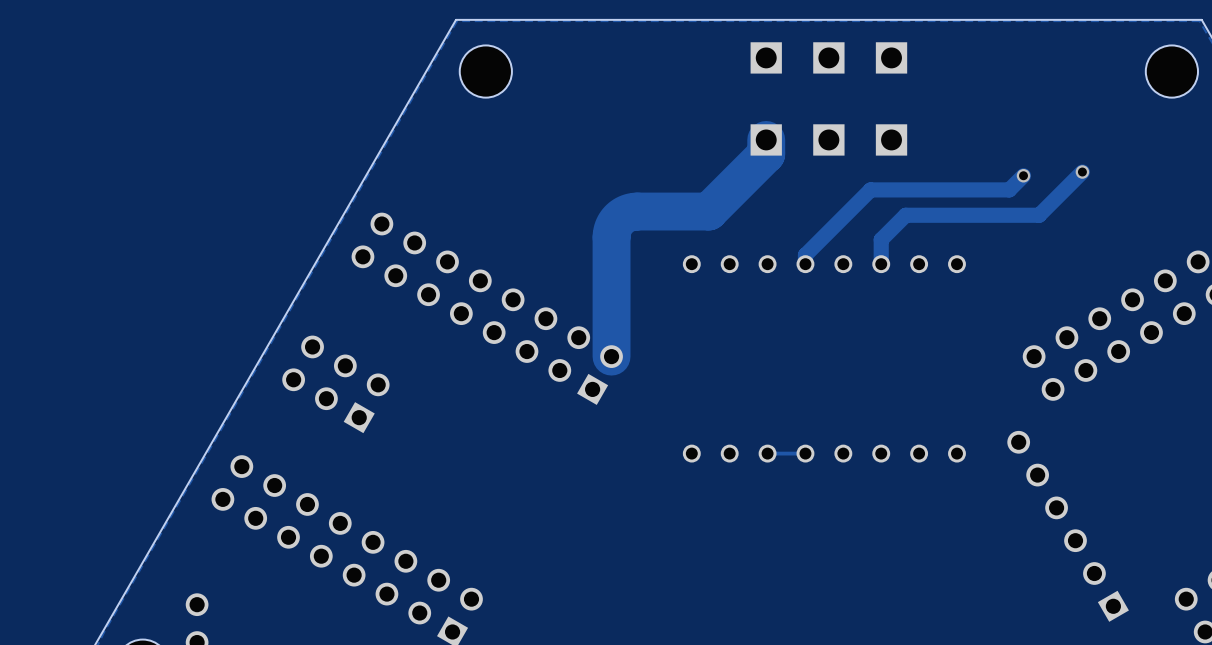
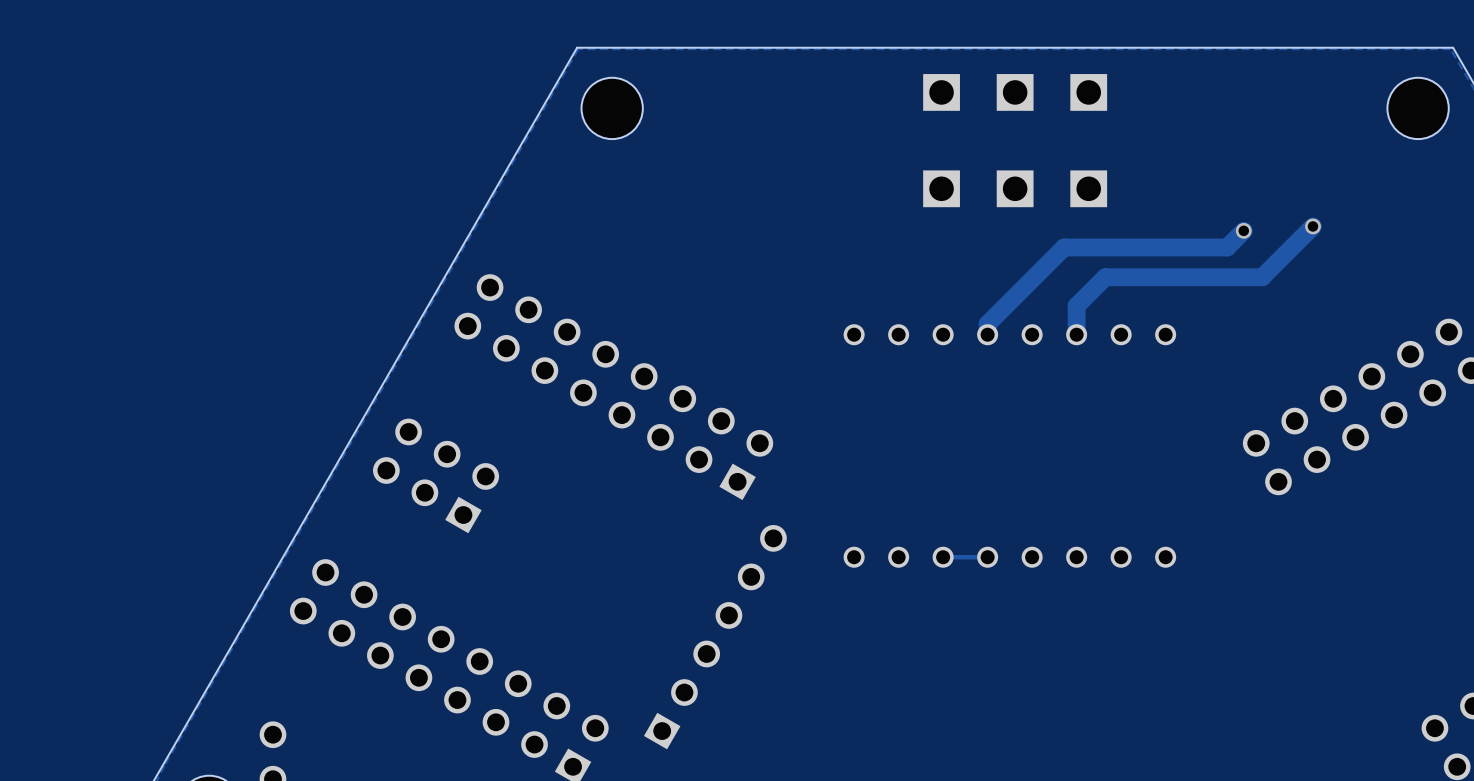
track: (766, 139) (766, 154) (708, 211) (633, 211) (624, 214) (616, 221) (611, 237) (611, 356) -> none
part: none -> (715, 637)
part: (1068, 526) -> none

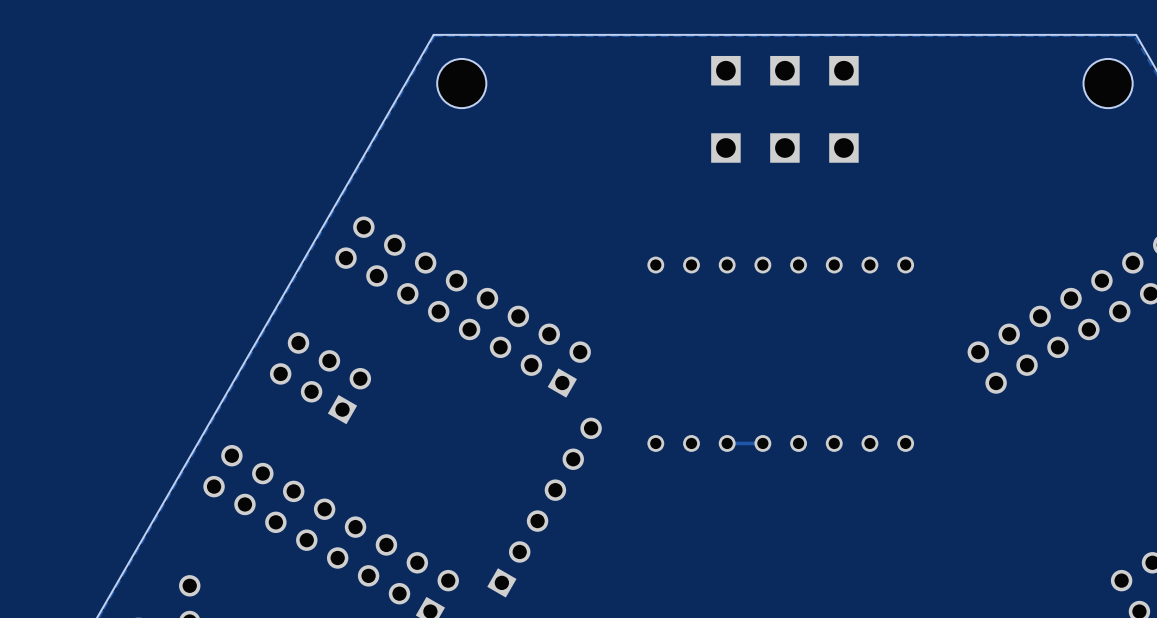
track: (1312, 226) (1262, 277) (1105, 277) (1076, 306) (1076, 334) -> none
via: (1312, 226) -> none
track: (1243, 230) (1227, 247) (1064, 247) (987, 324) (987, 334) -> none
via: (1243, 230) -> none

